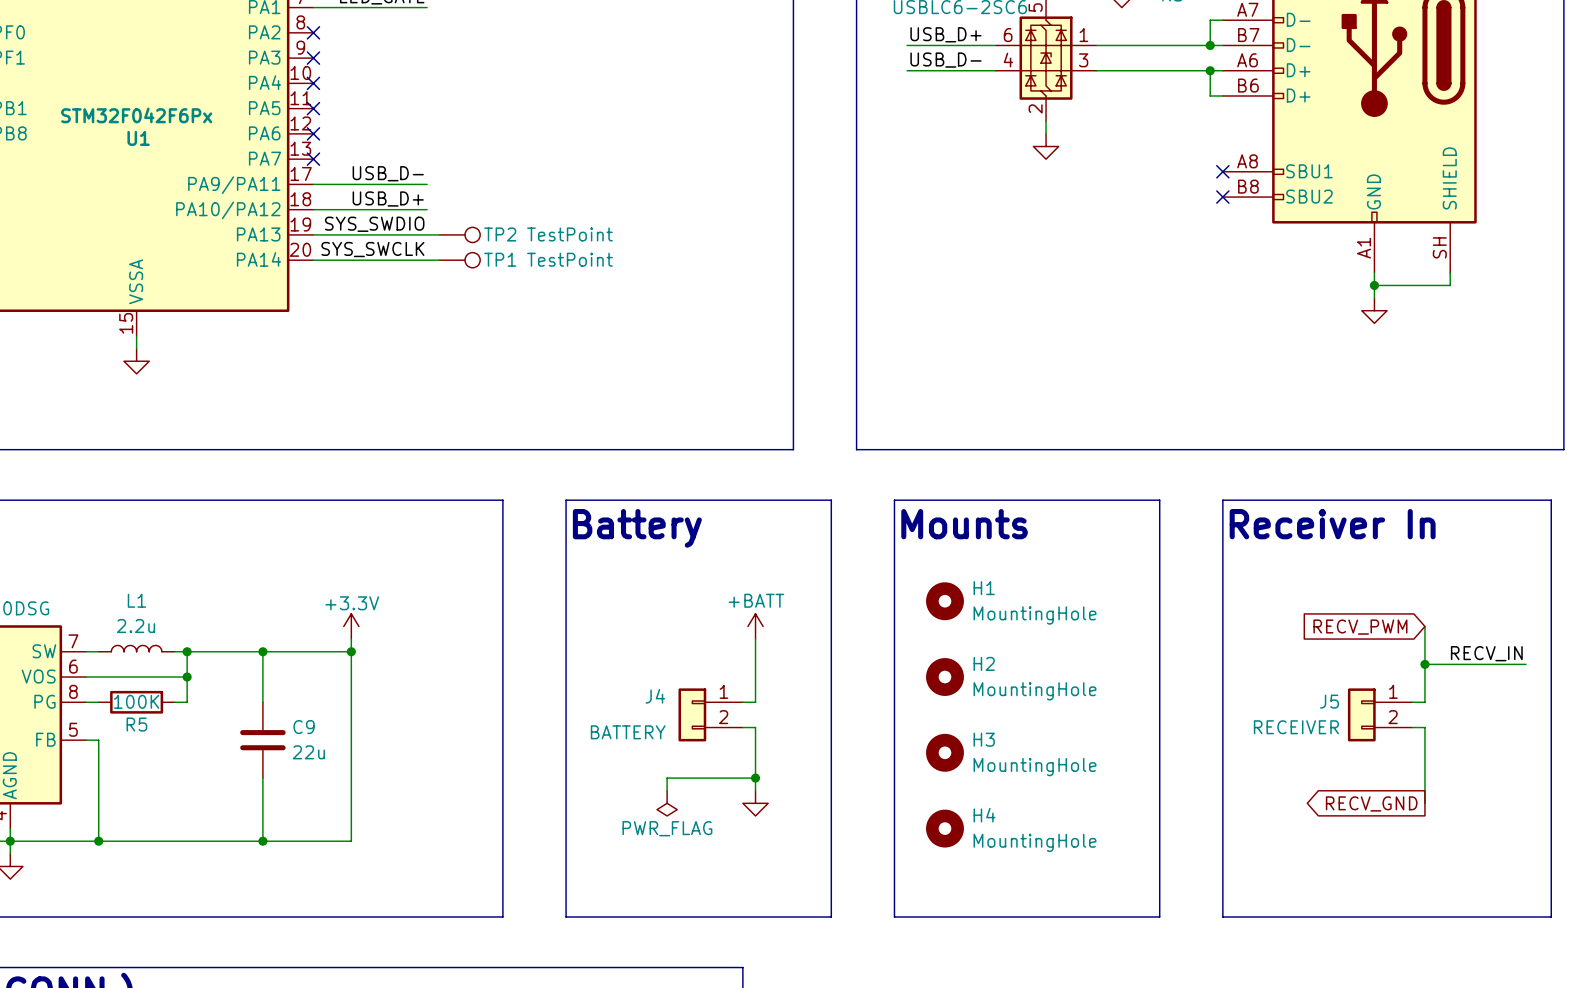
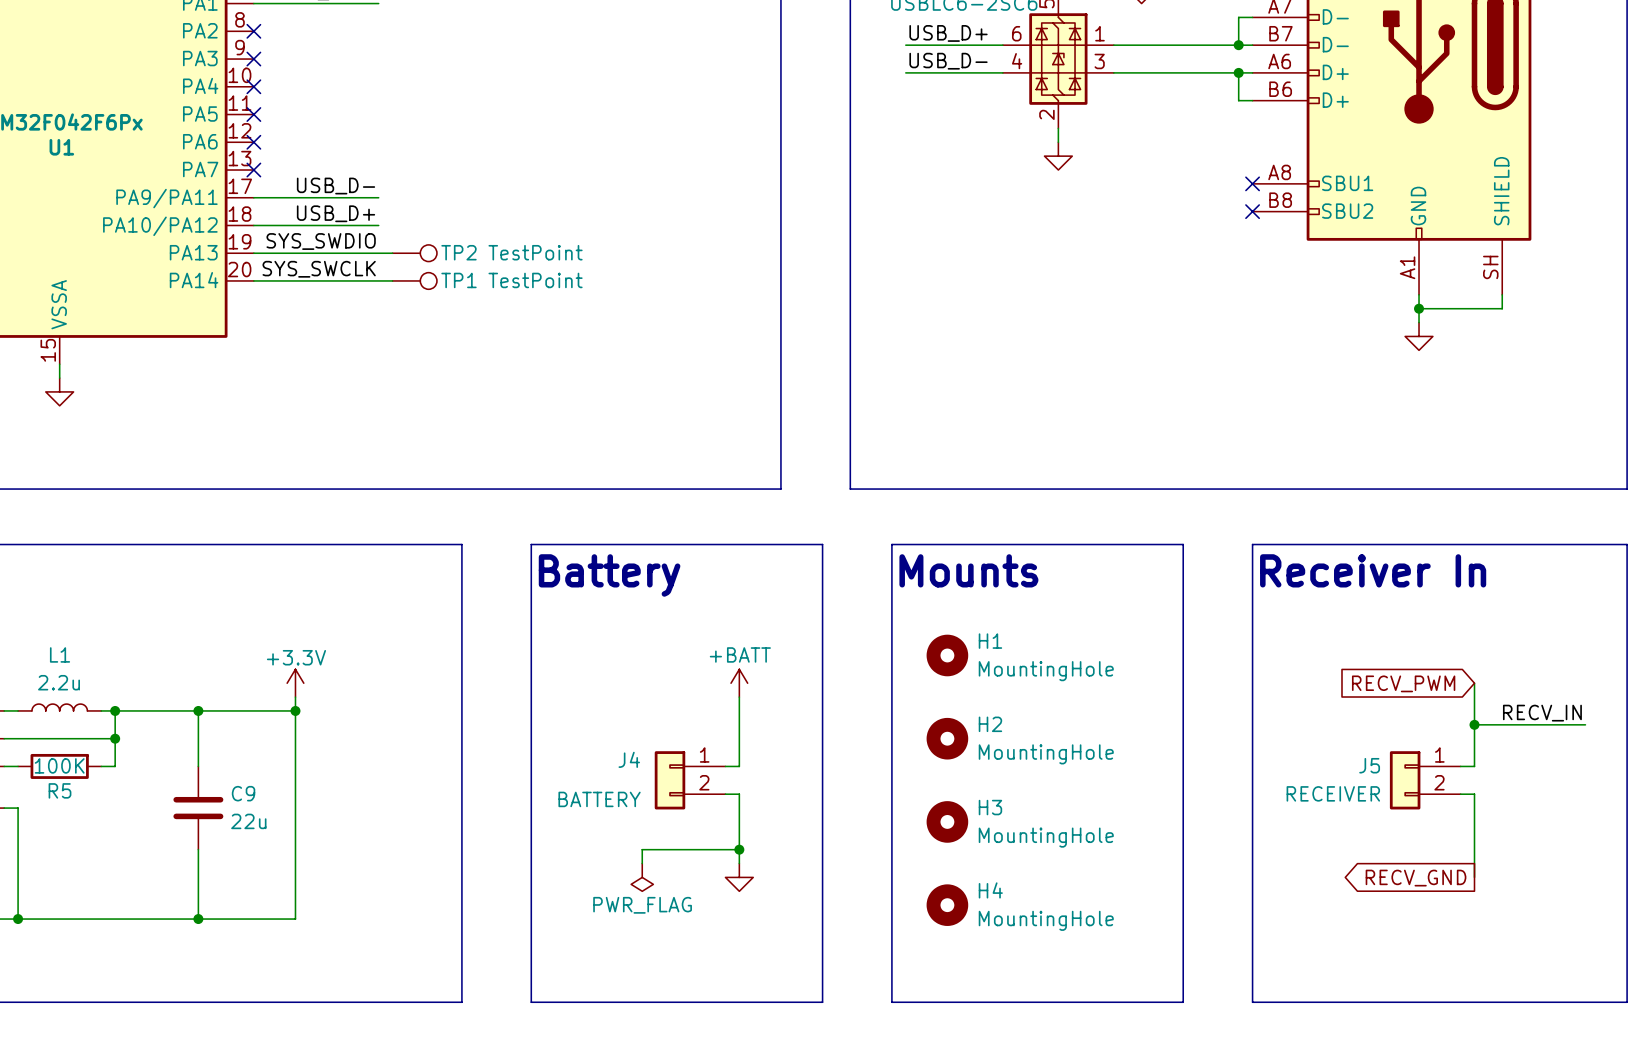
line: (1551, 500) (1551, 917) -> (1613, 544) (1627, 544) (1627, 1002) (1613, 1002)

